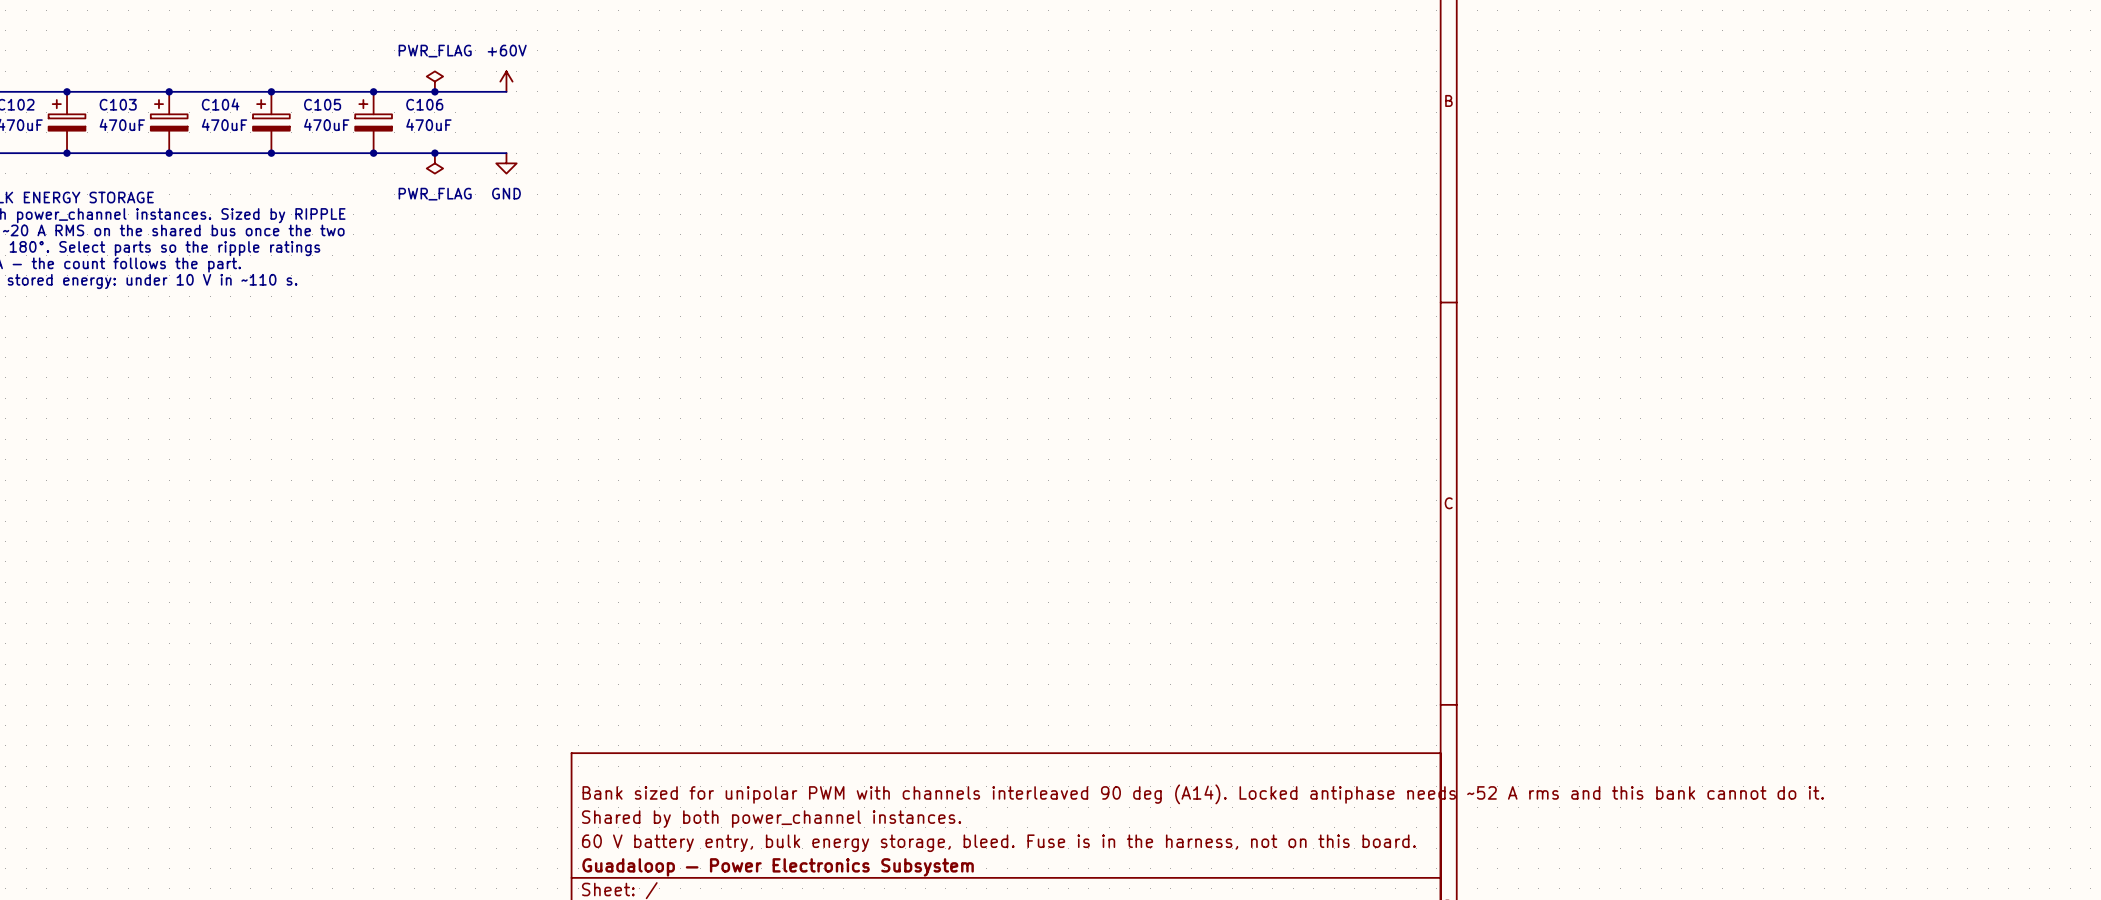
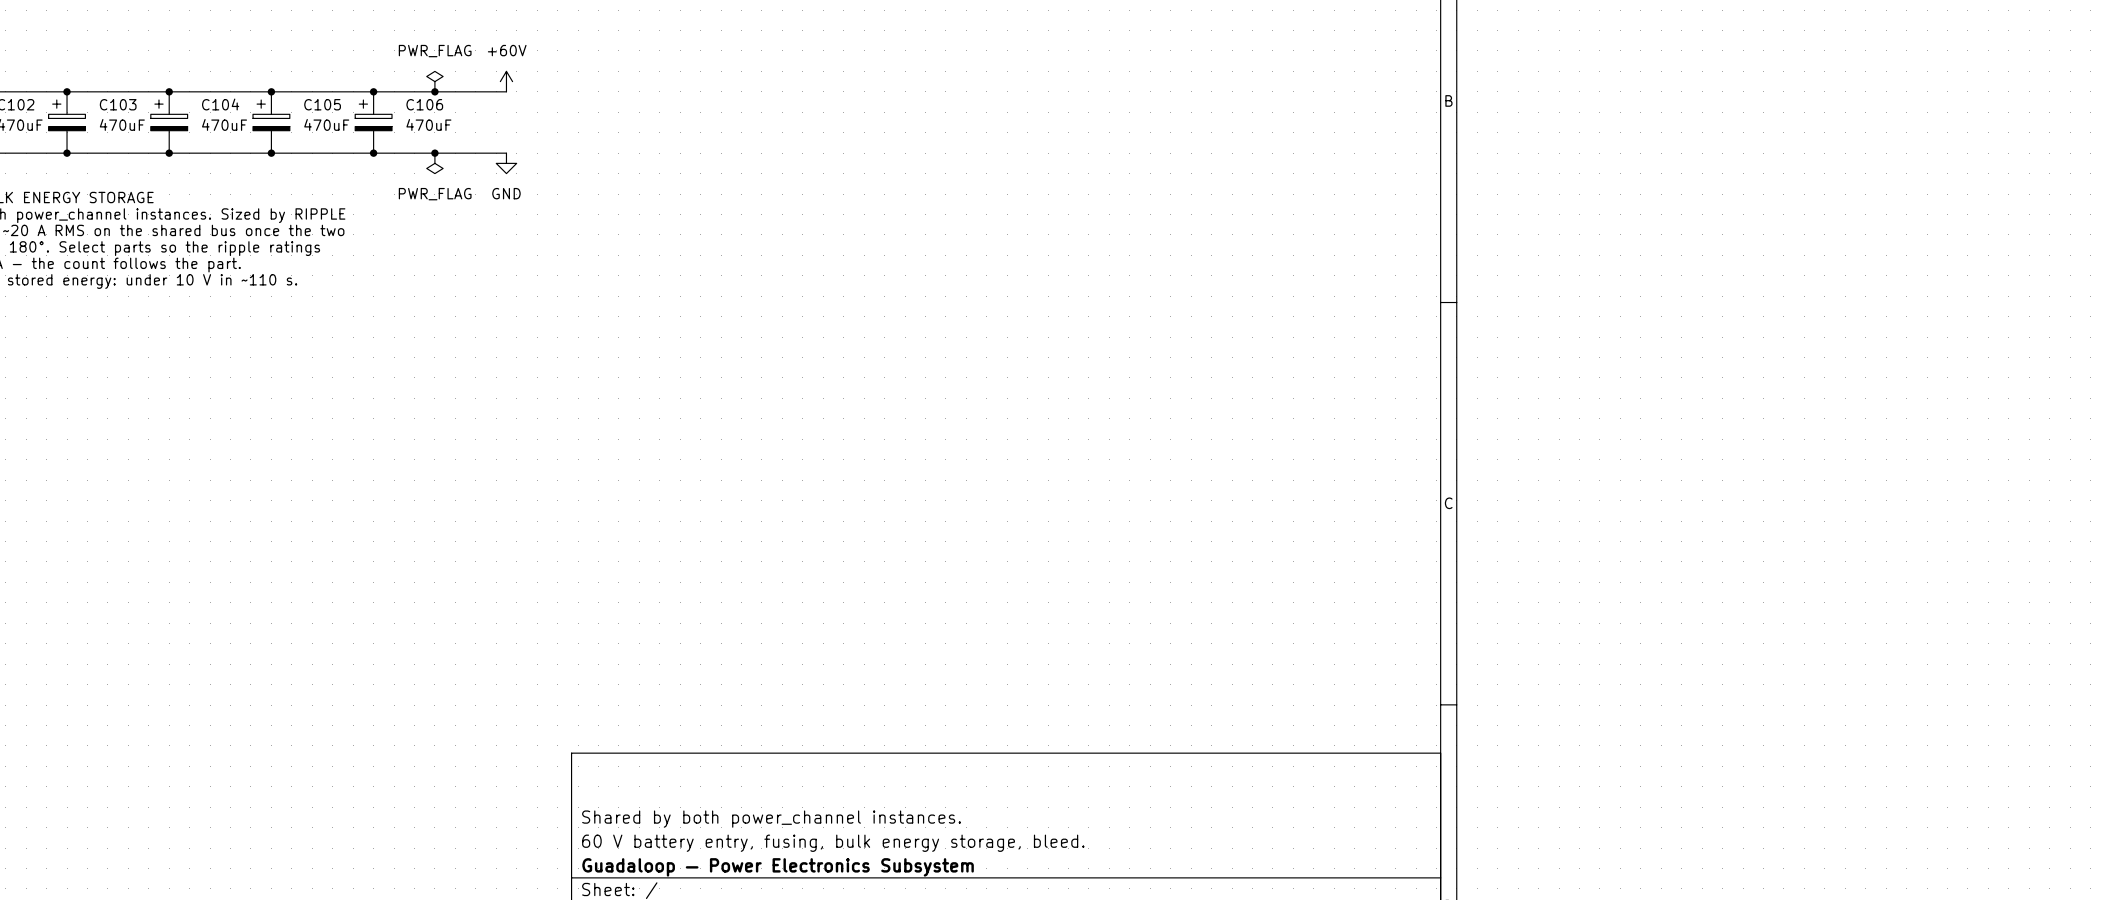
title block: Bank sized for unipolar PWM with channels interleaved 90 deg (A14). Locked antiphase needs ~52 A rms and this bank cannot do it. (1203, 794) -> none
title block: 60 V battery entry, bulk energy storage, bleed. Fuse is in the harness, not on this board. (998, 843) -> 60 V battery entry, fusing, bulk energy storage, bleed. (833, 843)

